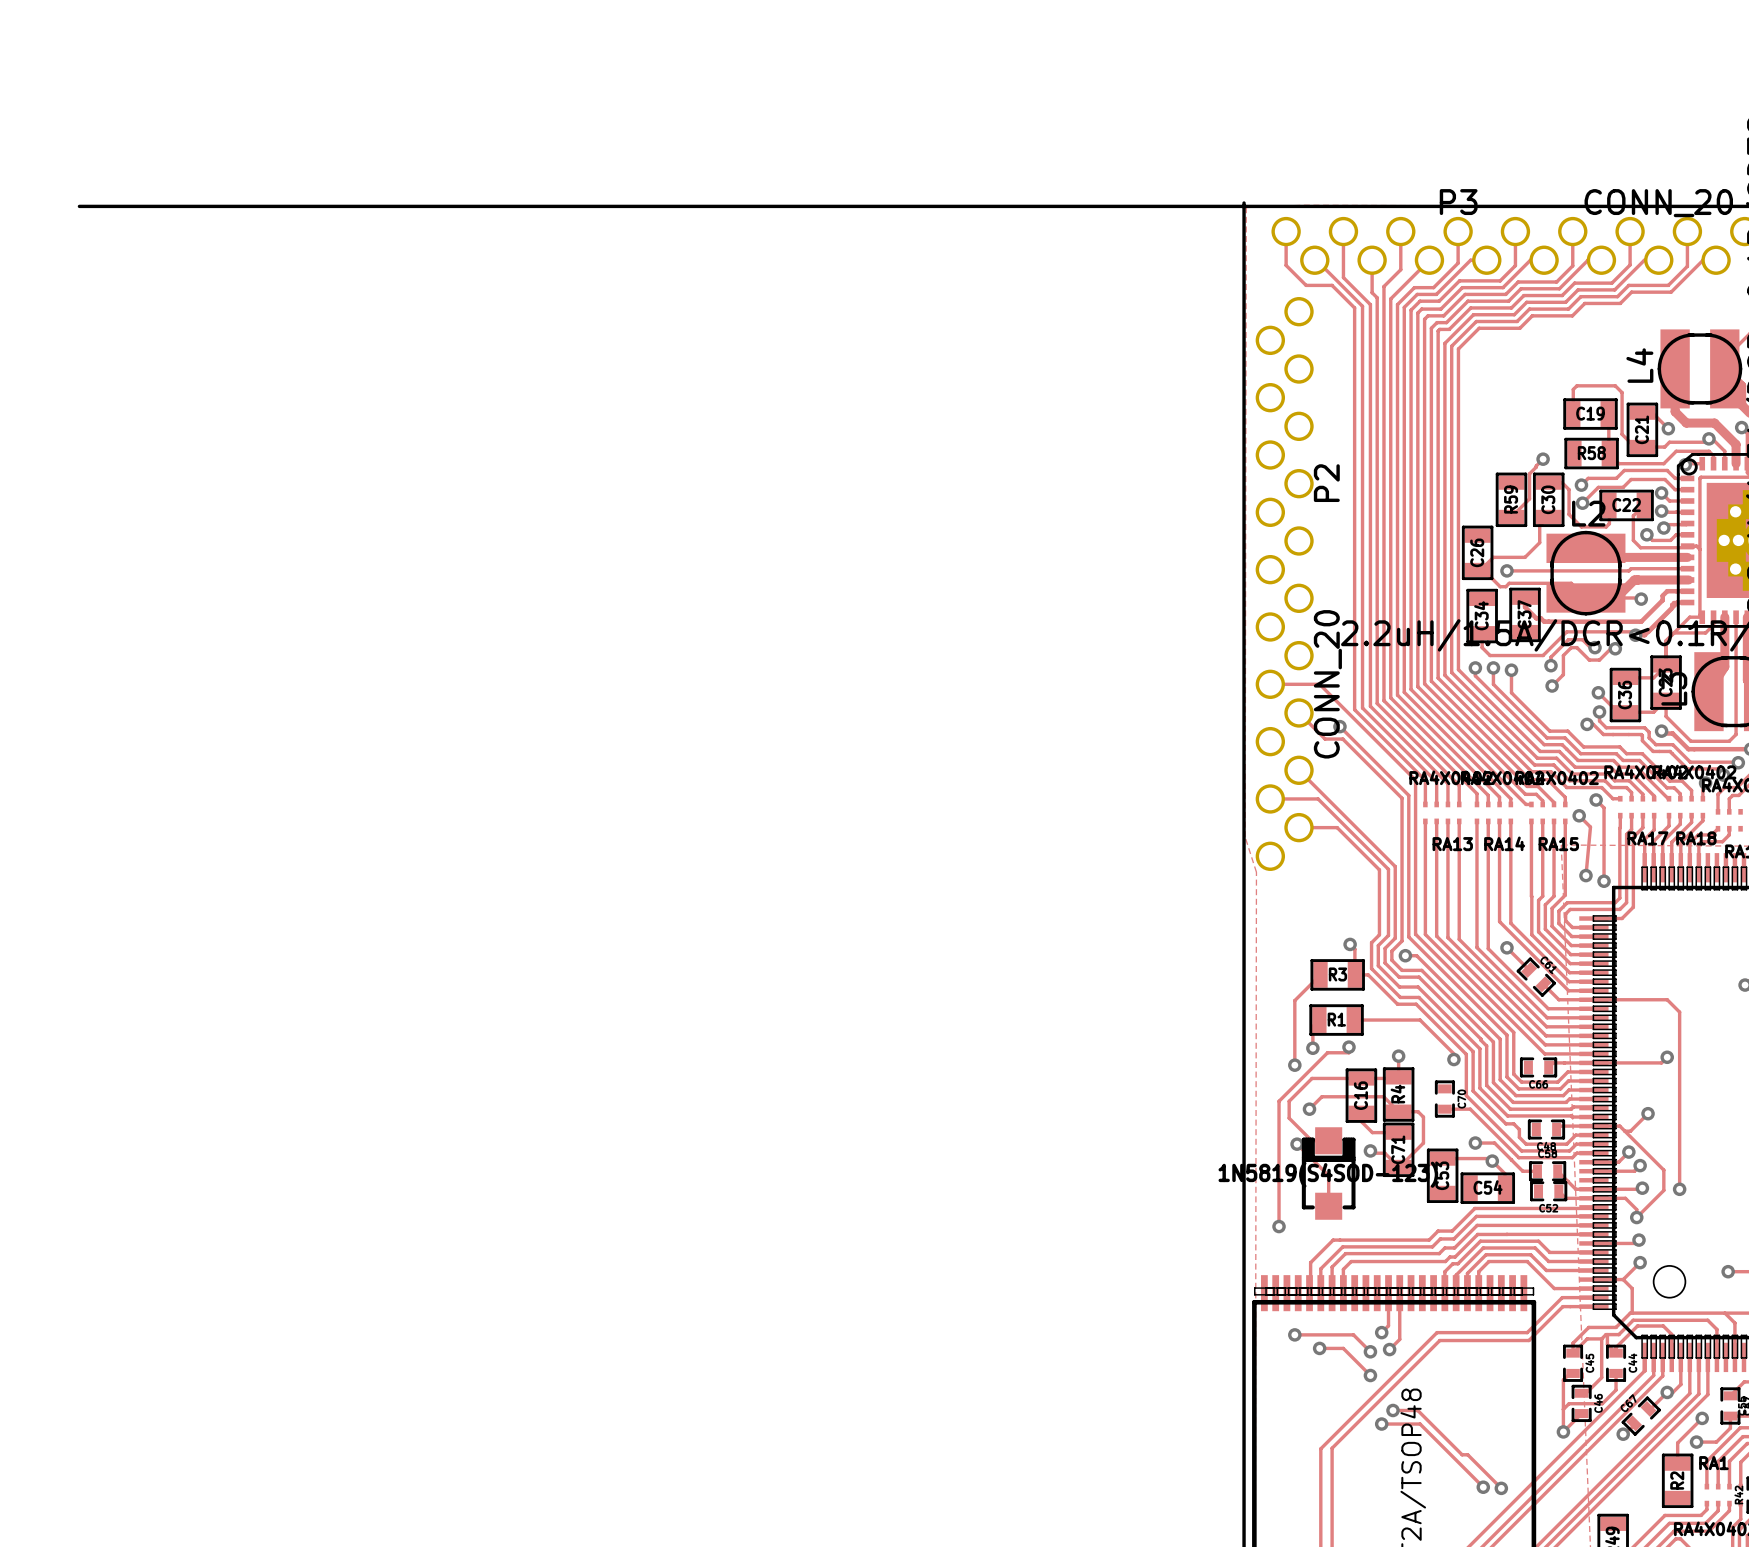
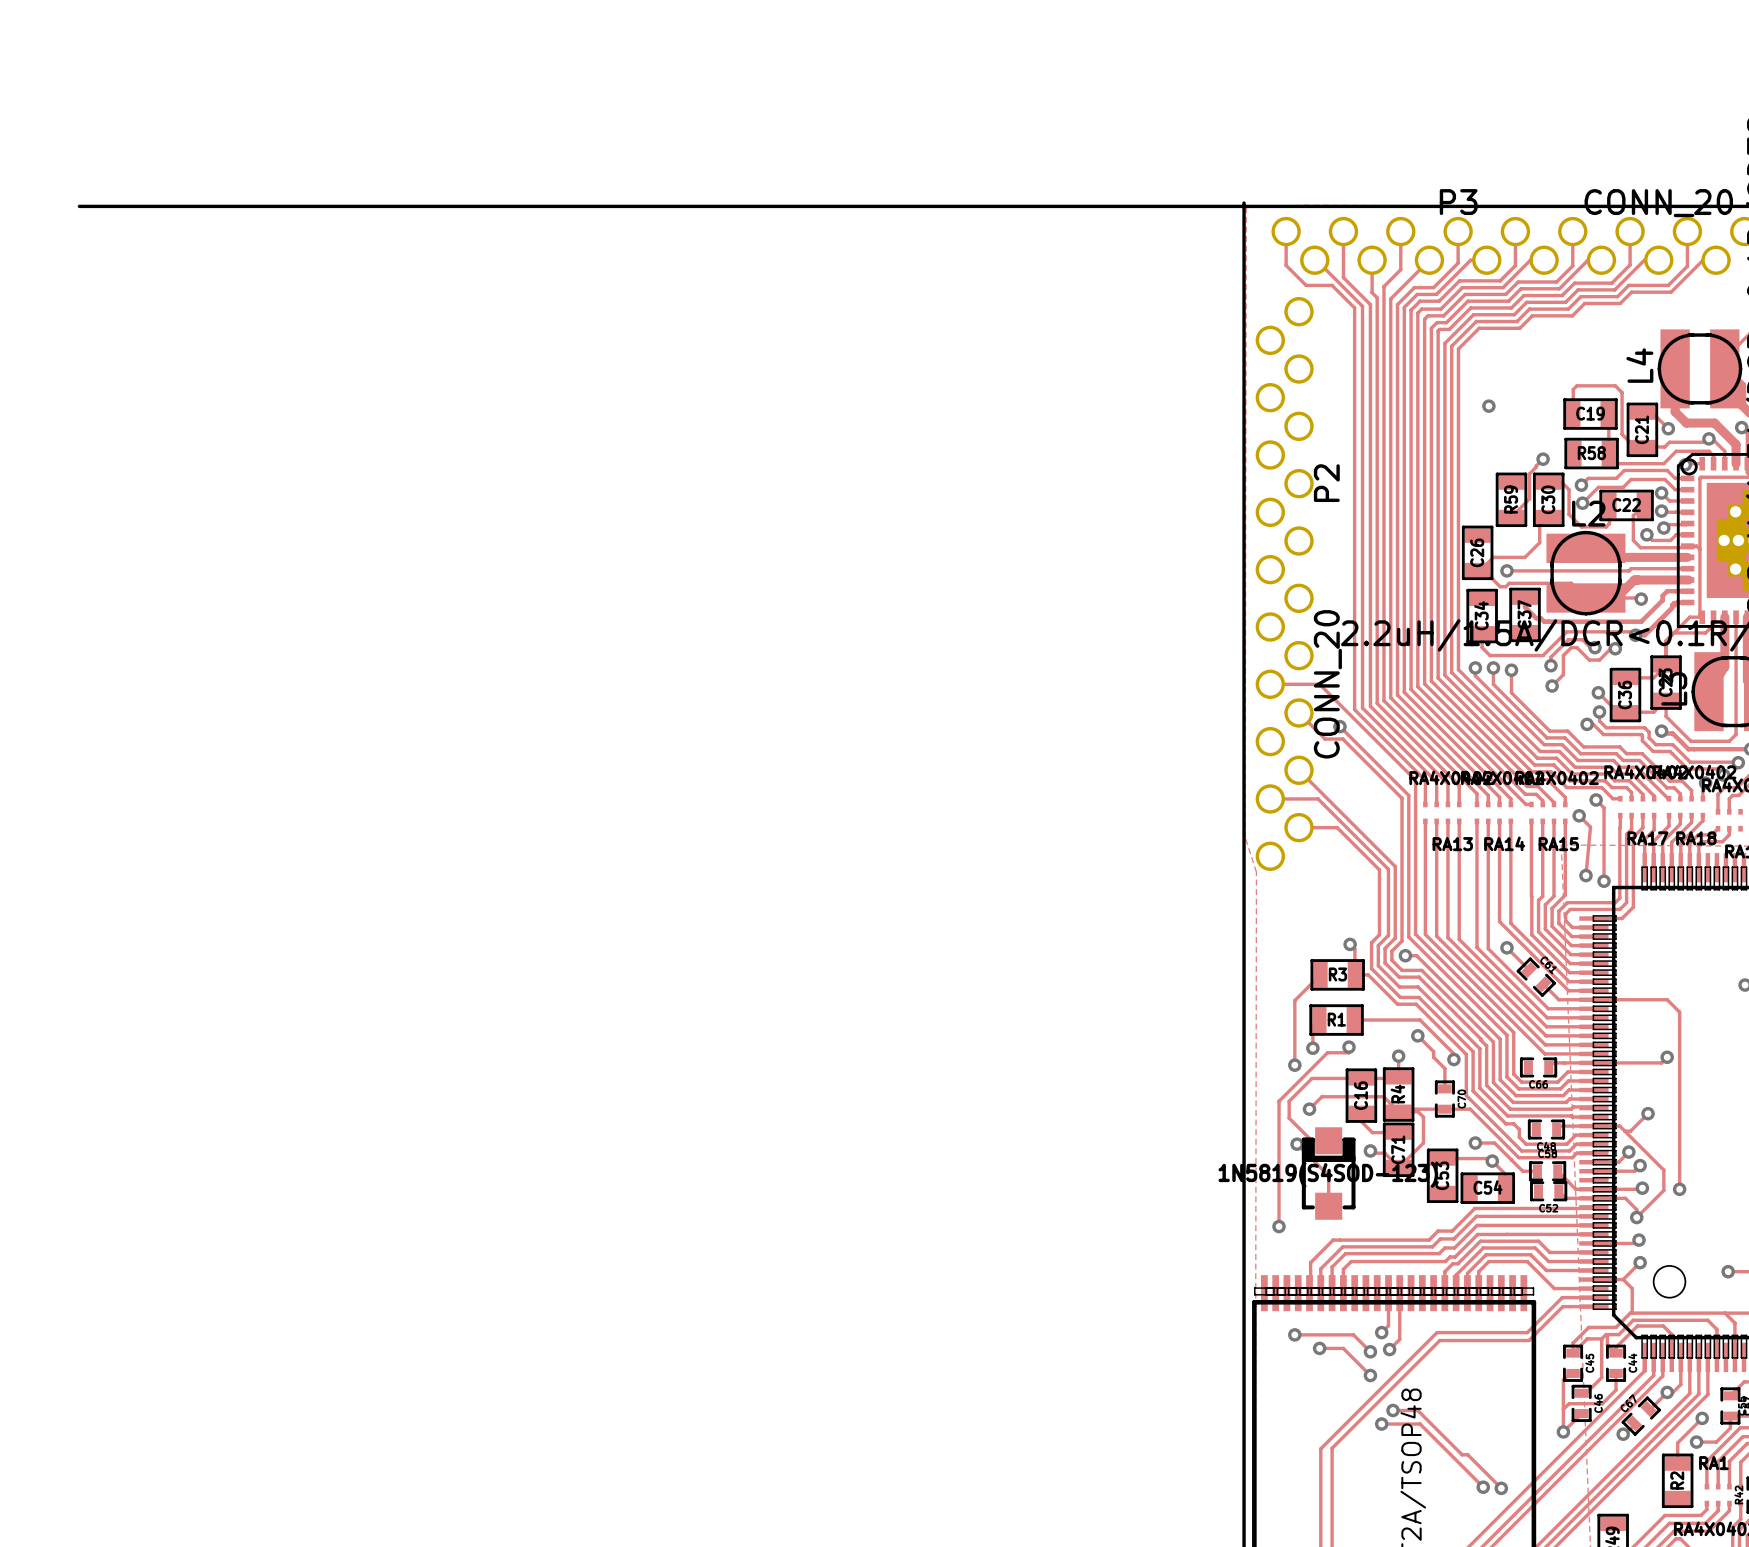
via: none -> (1488, 406)
track: none -> (1417, 1035) (1433, 1051) (1433, 1057) (1444, 1068) (1444, 1088)
via: none -> (1417, 1035)
track: none -> (1444, 1109) (1401, 1109) (1398, 1111)

